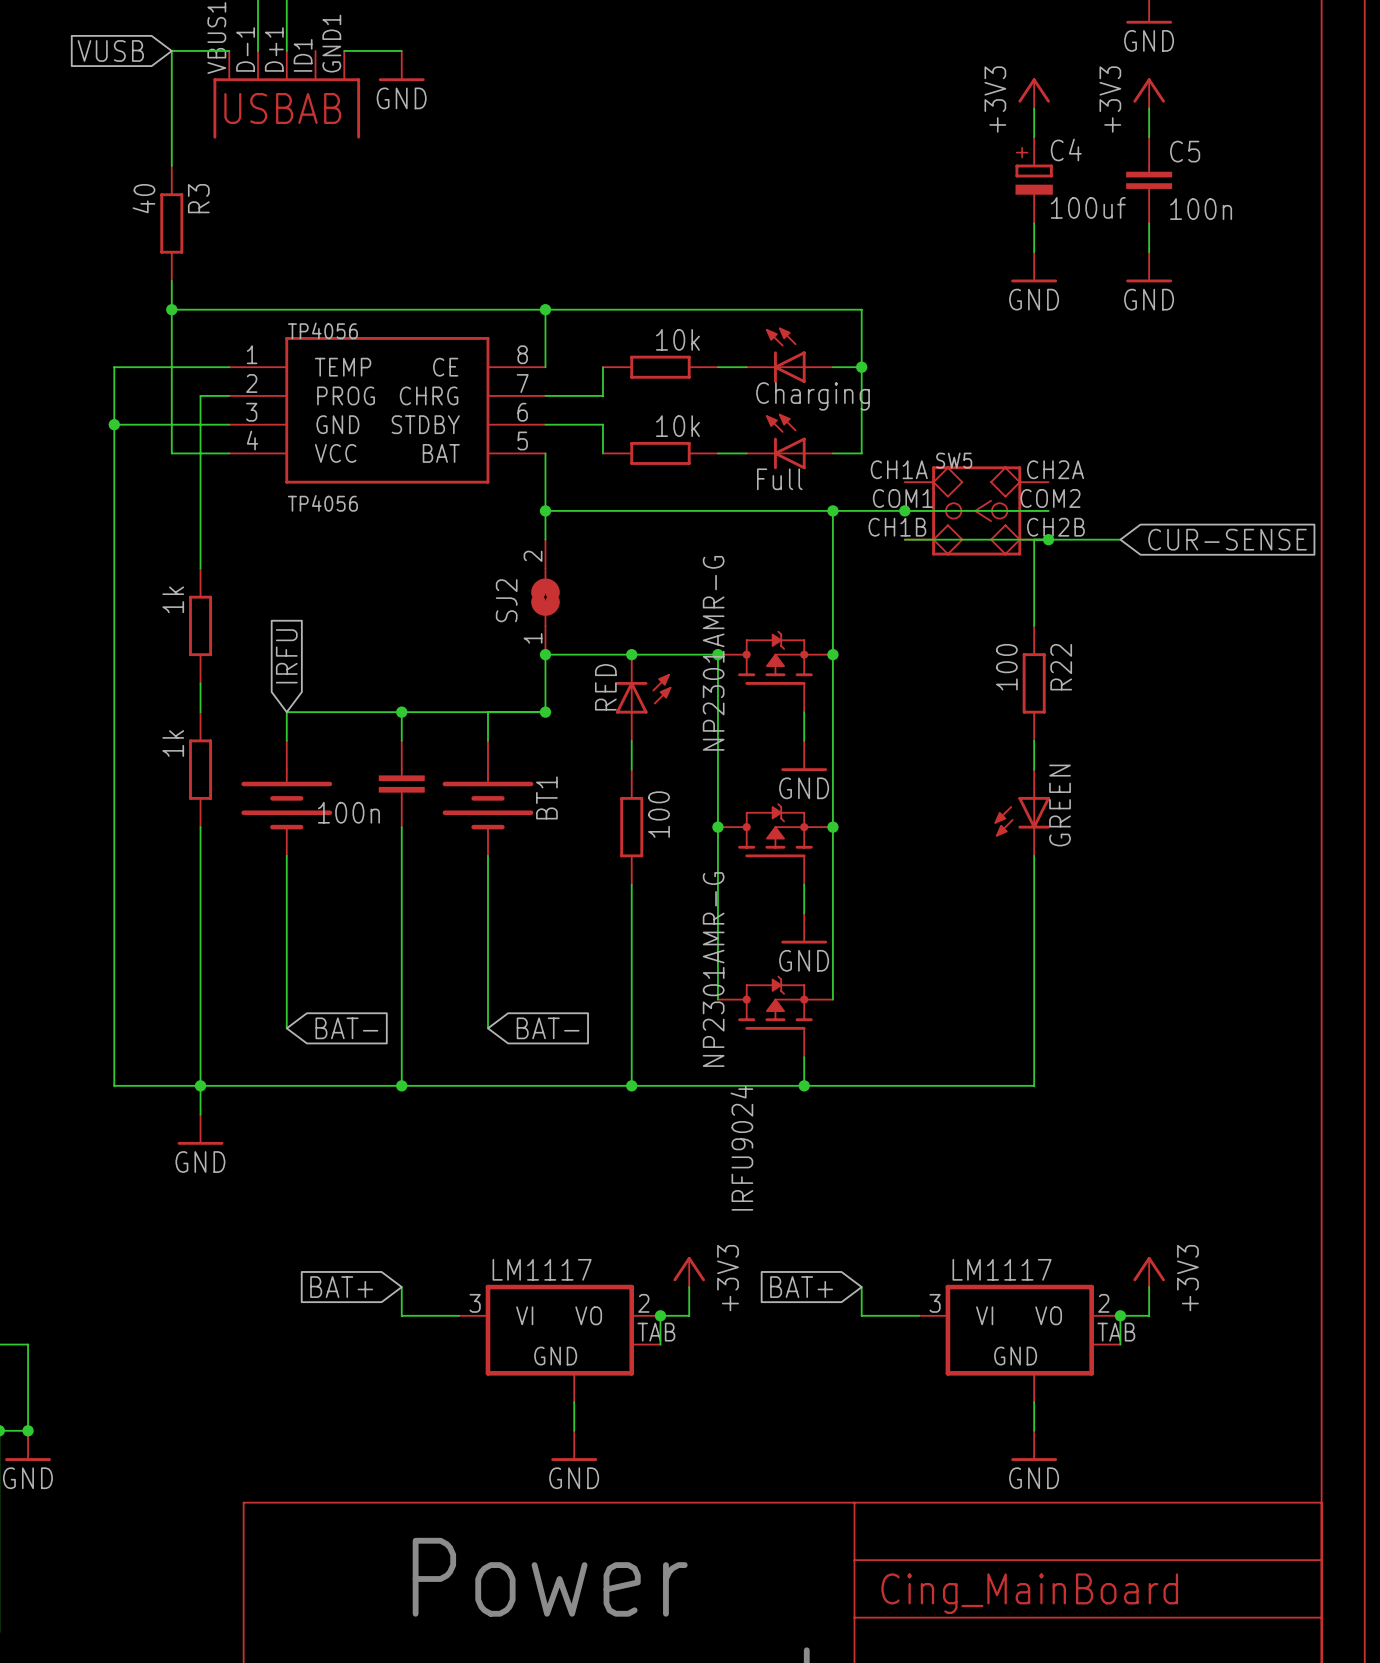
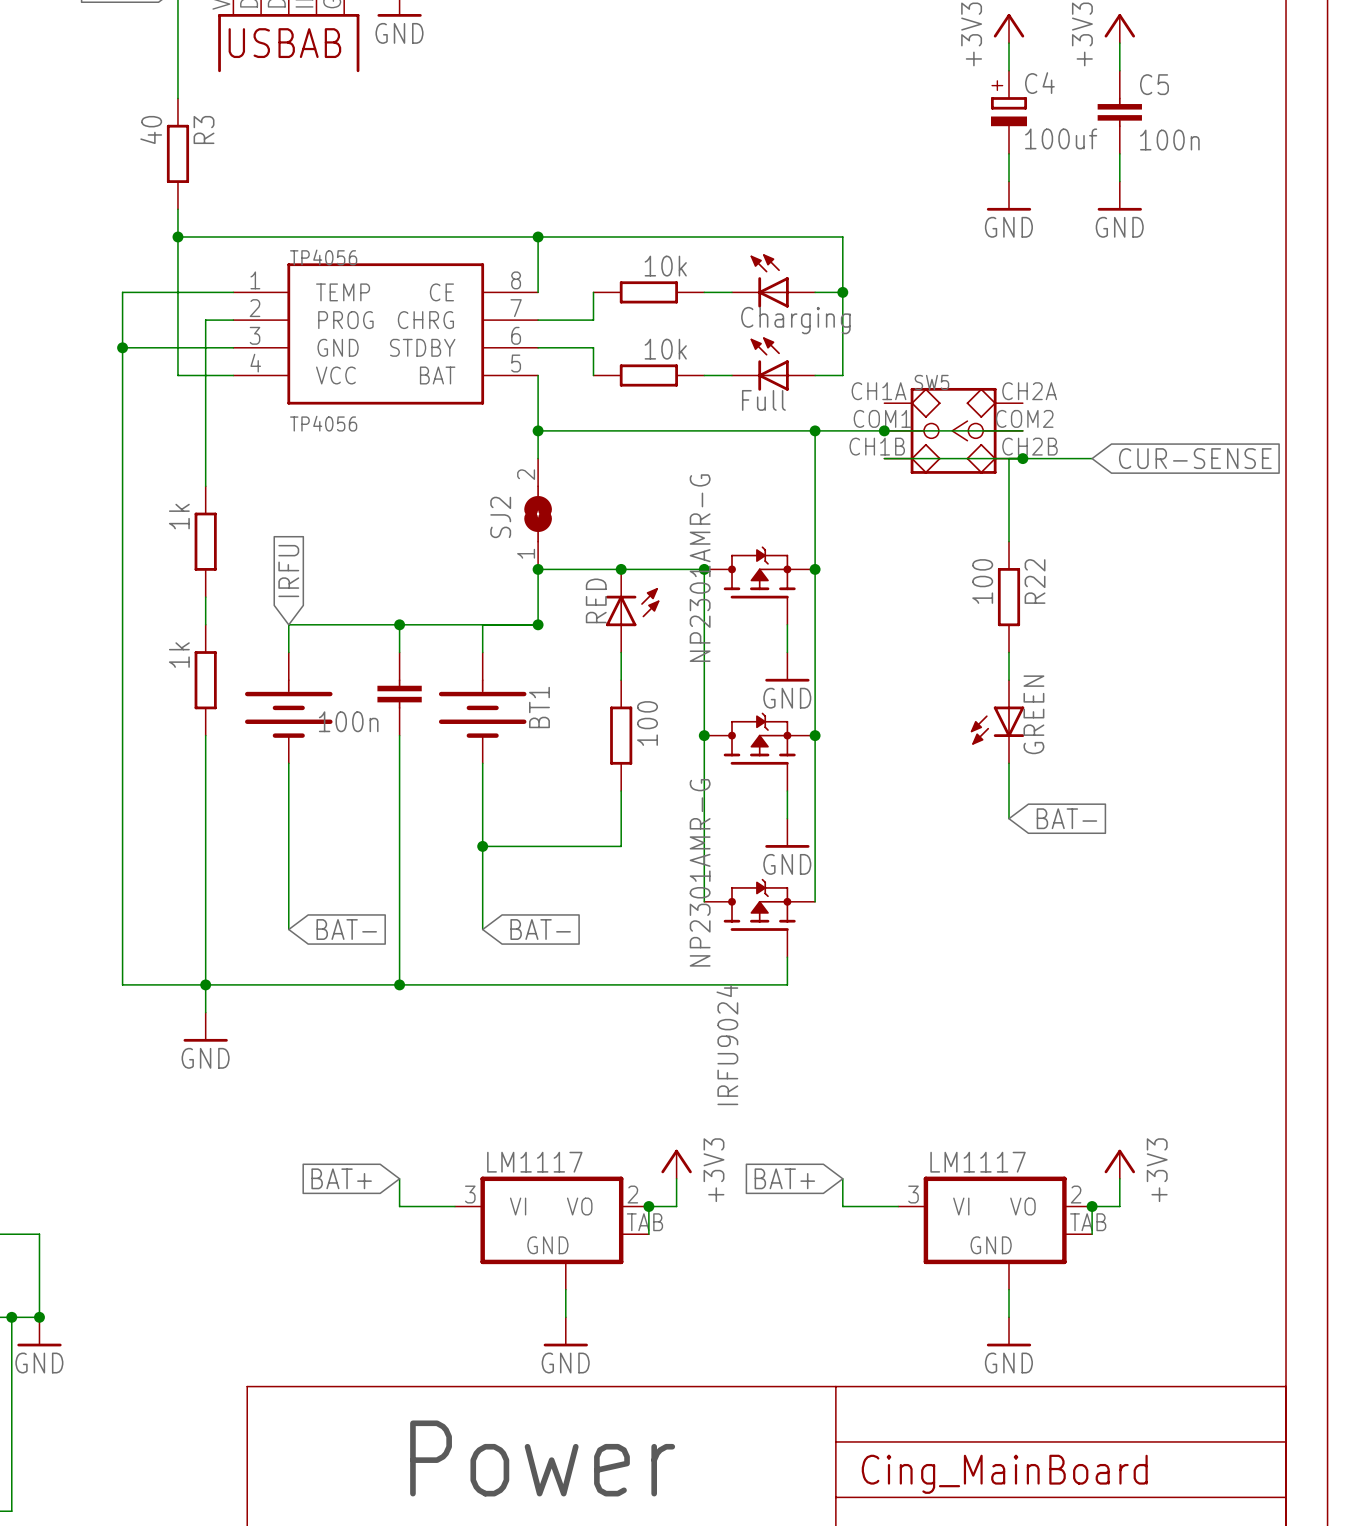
wire: (1034, 913) (1034, 1085) (804, 1085) -> none
global label: none -> BAT- (1066, 818)
junction: none -> (482, 846)
wire: (631, 942) (631, 1085) -> (621, 846) (482, 846)
junction: (631, 1085) -> none
junction: (804, 1085) -> none

